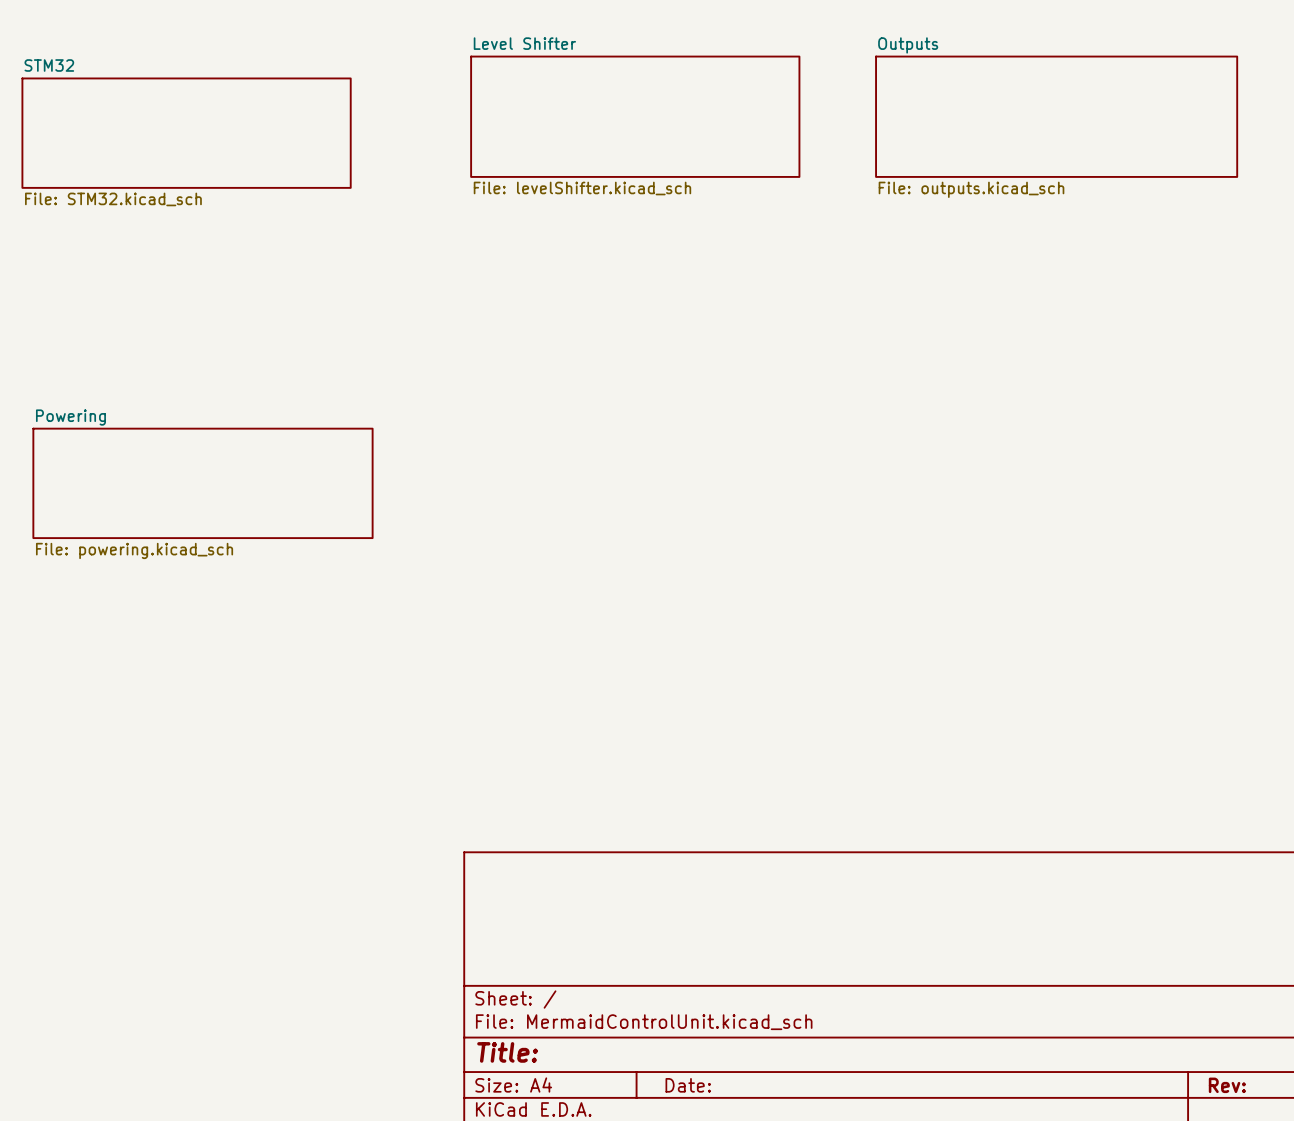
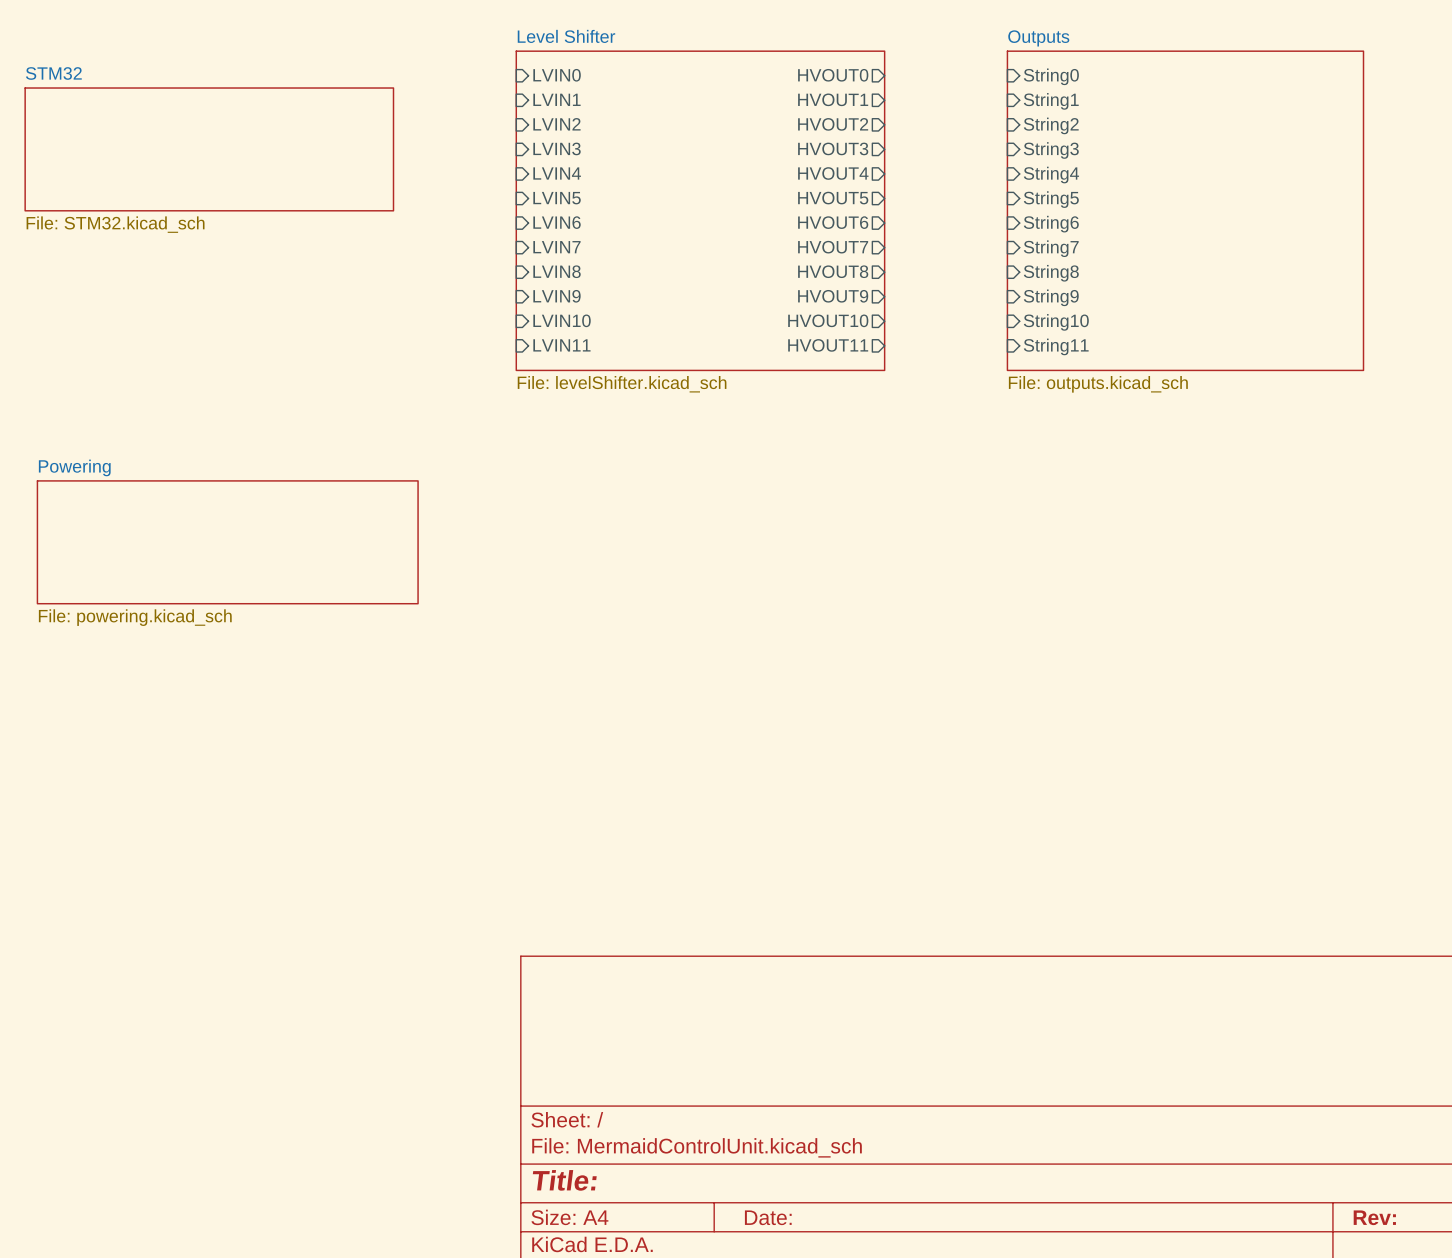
sheet pin: none -> LVIN0 (557, 75)
sheet pin: none -> HVOUT0 (833, 75)
sheet pin: none -> String0 (1051, 76)
sheet pin: none -> LVIN1 (556, 99)
sheet pin: none -> HVOUT1 (833, 99)
sheet pin: none -> String1 (1051, 101)
sheet pin: none -> LVIN2 (556, 124)
sheet pin: none -> HVOUT2 (833, 124)
sheet pin: none -> String2 (1051, 125)
sheet Level Shifter: File: levelShifter.kicad_sch (635, 116) -> none
sheet Outputs: File: outputs.kicad_sch (1056, 116) -> none
sheet pin: none -> LVIN3 (557, 148)
sheet pin: none -> HVOUT3 (833, 148)
sheet pin: none -> String3 (1051, 150)
sheet pin: none -> LVIN4 (557, 173)
sheet pin: none -> HVOUT4 (833, 173)
sheet pin: none -> String4 (1051, 175)
sheet pin: none -> LVIN5 (557, 198)
sheet pin: none -> HVOUT5 (833, 198)
sheet pin: none -> String5 (1051, 199)
sheet Level Shifter: none -> File: levelShifter.kicad_sch (700, 210)
sheet Outputs: none -> File: outputs.kicad_sch (1185, 210)
sheet pin: none -> LVIN6 (557, 222)
sheet pin: none -> HVOUT6 (833, 222)
sheet pin: none -> String6 (1051, 224)
sheet pin: none -> LVIN7 (556, 247)
sheet pin: none -> HVOUT7 (833, 247)
sheet pin: none -> String7 (1051, 248)
sheet pin: none -> LVIN8 (557, 271)
sheet pin: none -> HVOUT8 (833, 271)
sheet pin: none -> String8 (1051, 273)
sheet pin: none -> LVIN9 (556, 296)
sheet pin: none -> HVOUT9 (833, 296)
sheet pin: none -> String9 (1051, 297)
sheet pin: none -> LVIN10 (562, 320)
sheet pin: none -> HVOUT10 (828, 320)
sheet pin: none -> String10 (1056, 322)
sheet pin: none -> LVIN11 (561, 345)
sheet pin: none -> HVOUT11 (828, 345)
sheet pin: none -> String11 (1056, 346)

